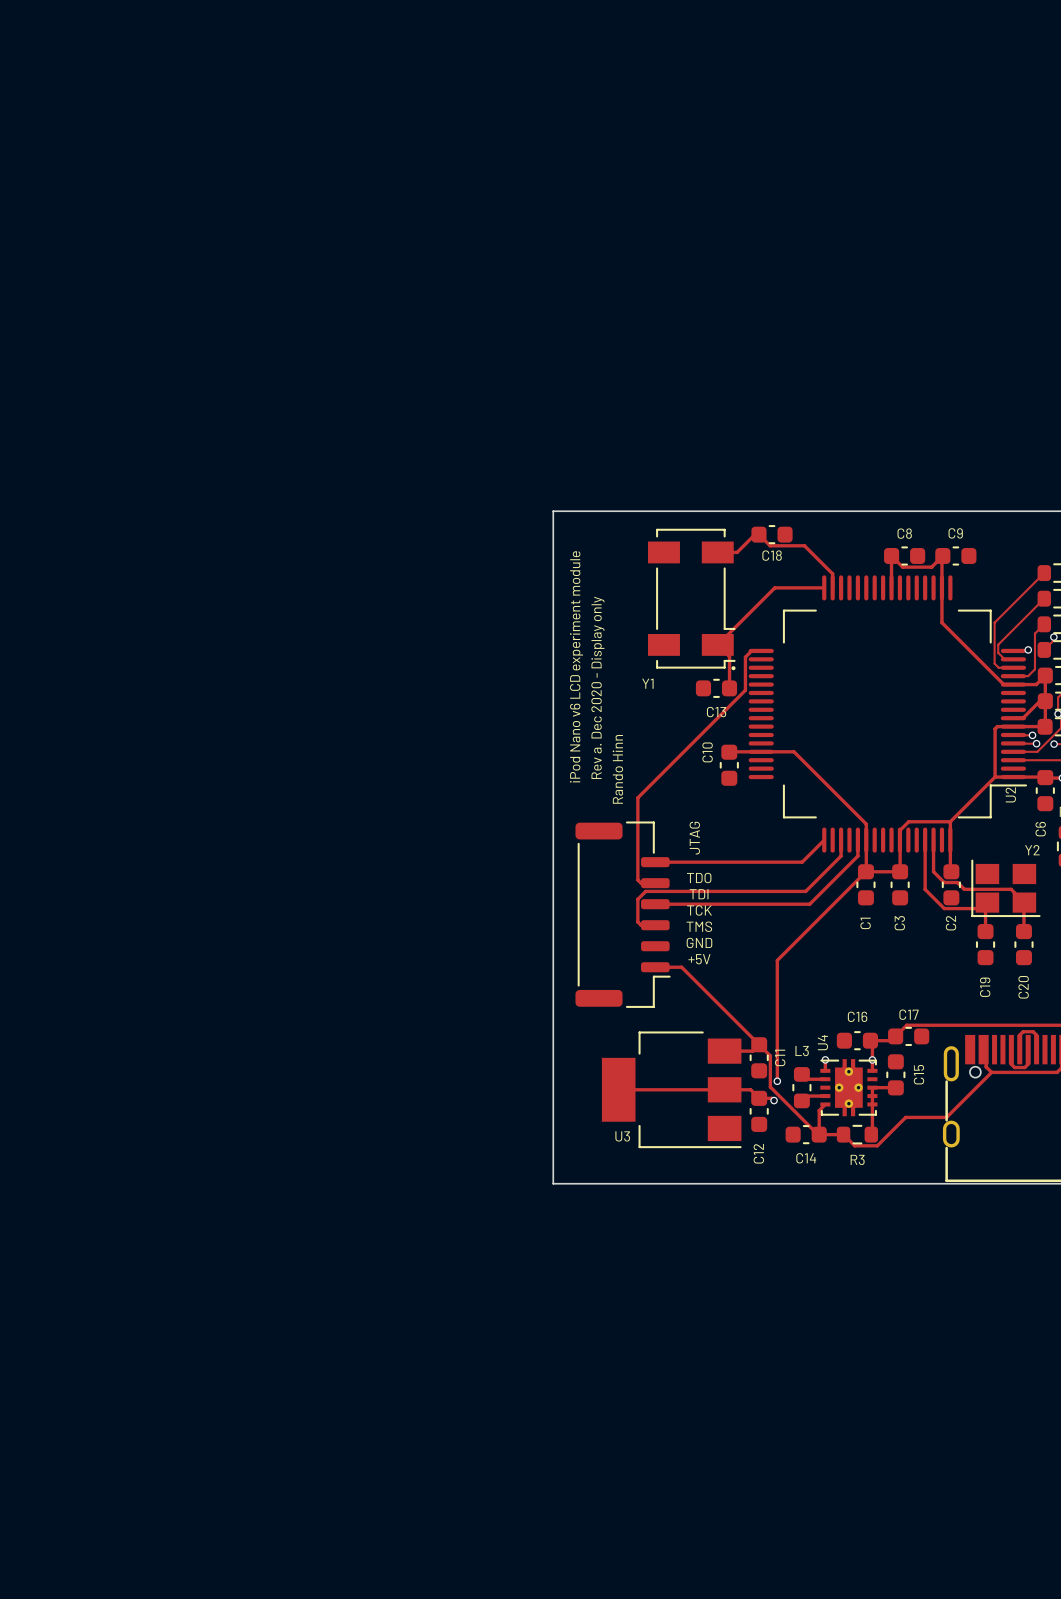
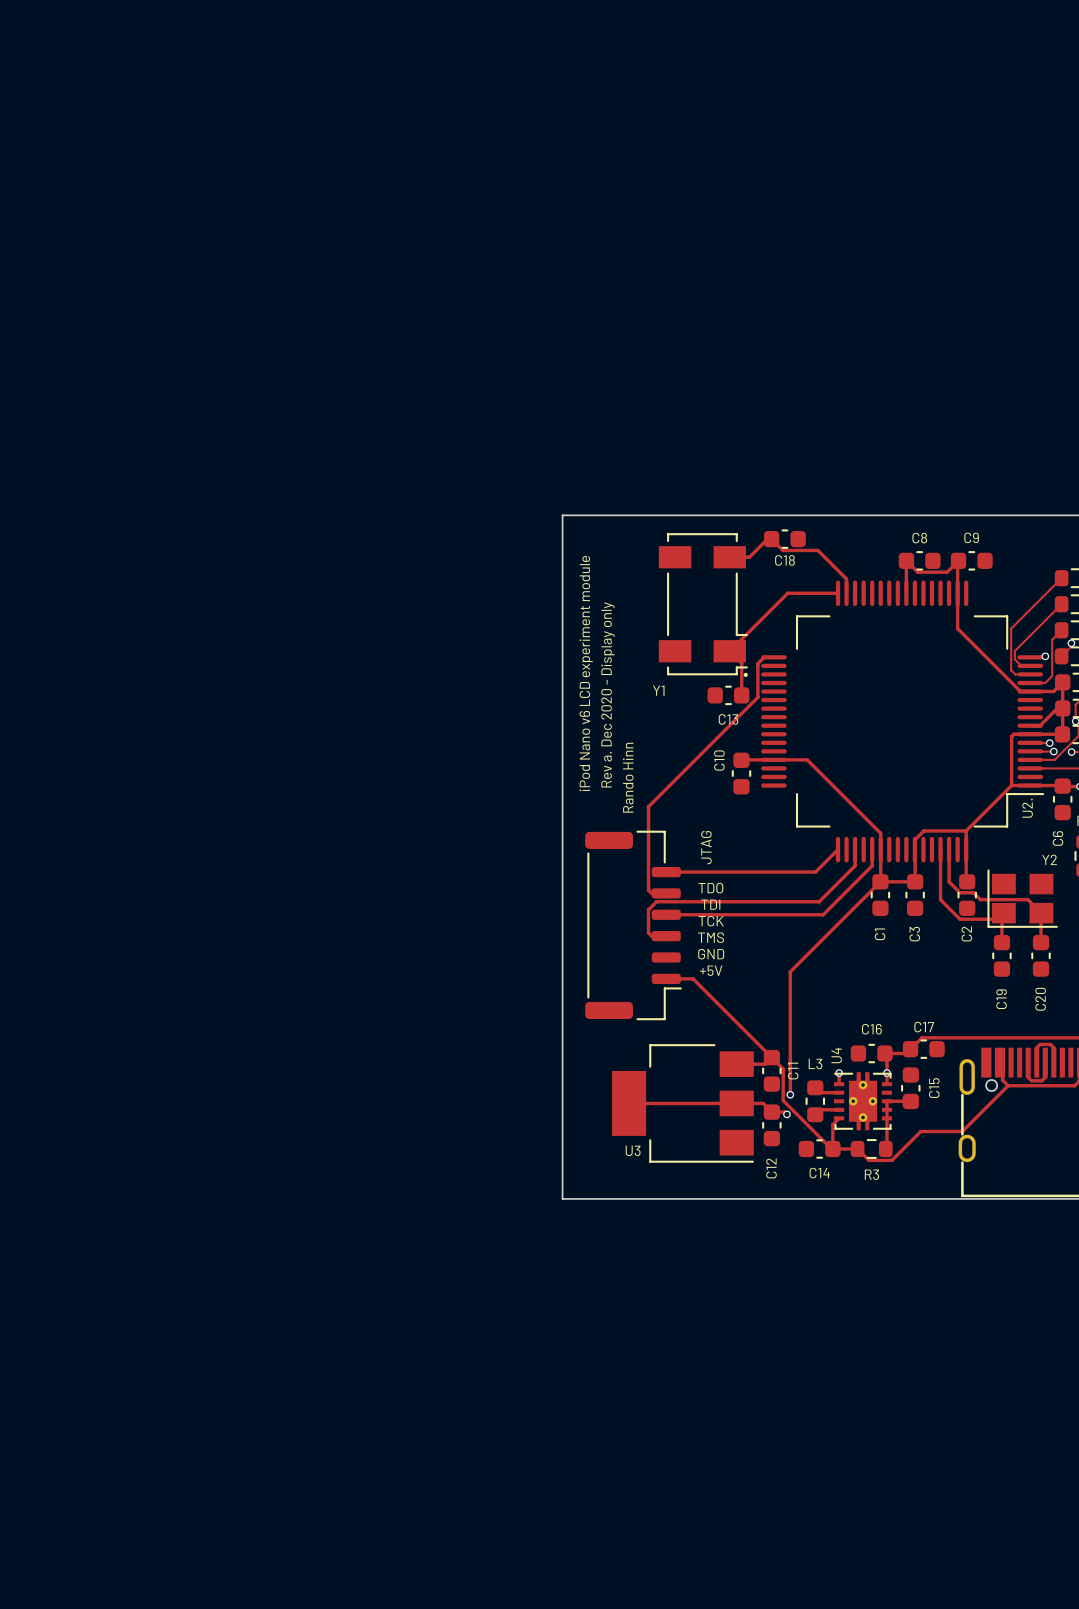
U2 name: U2 (1010, 794) -> U2. (1027, 808)

